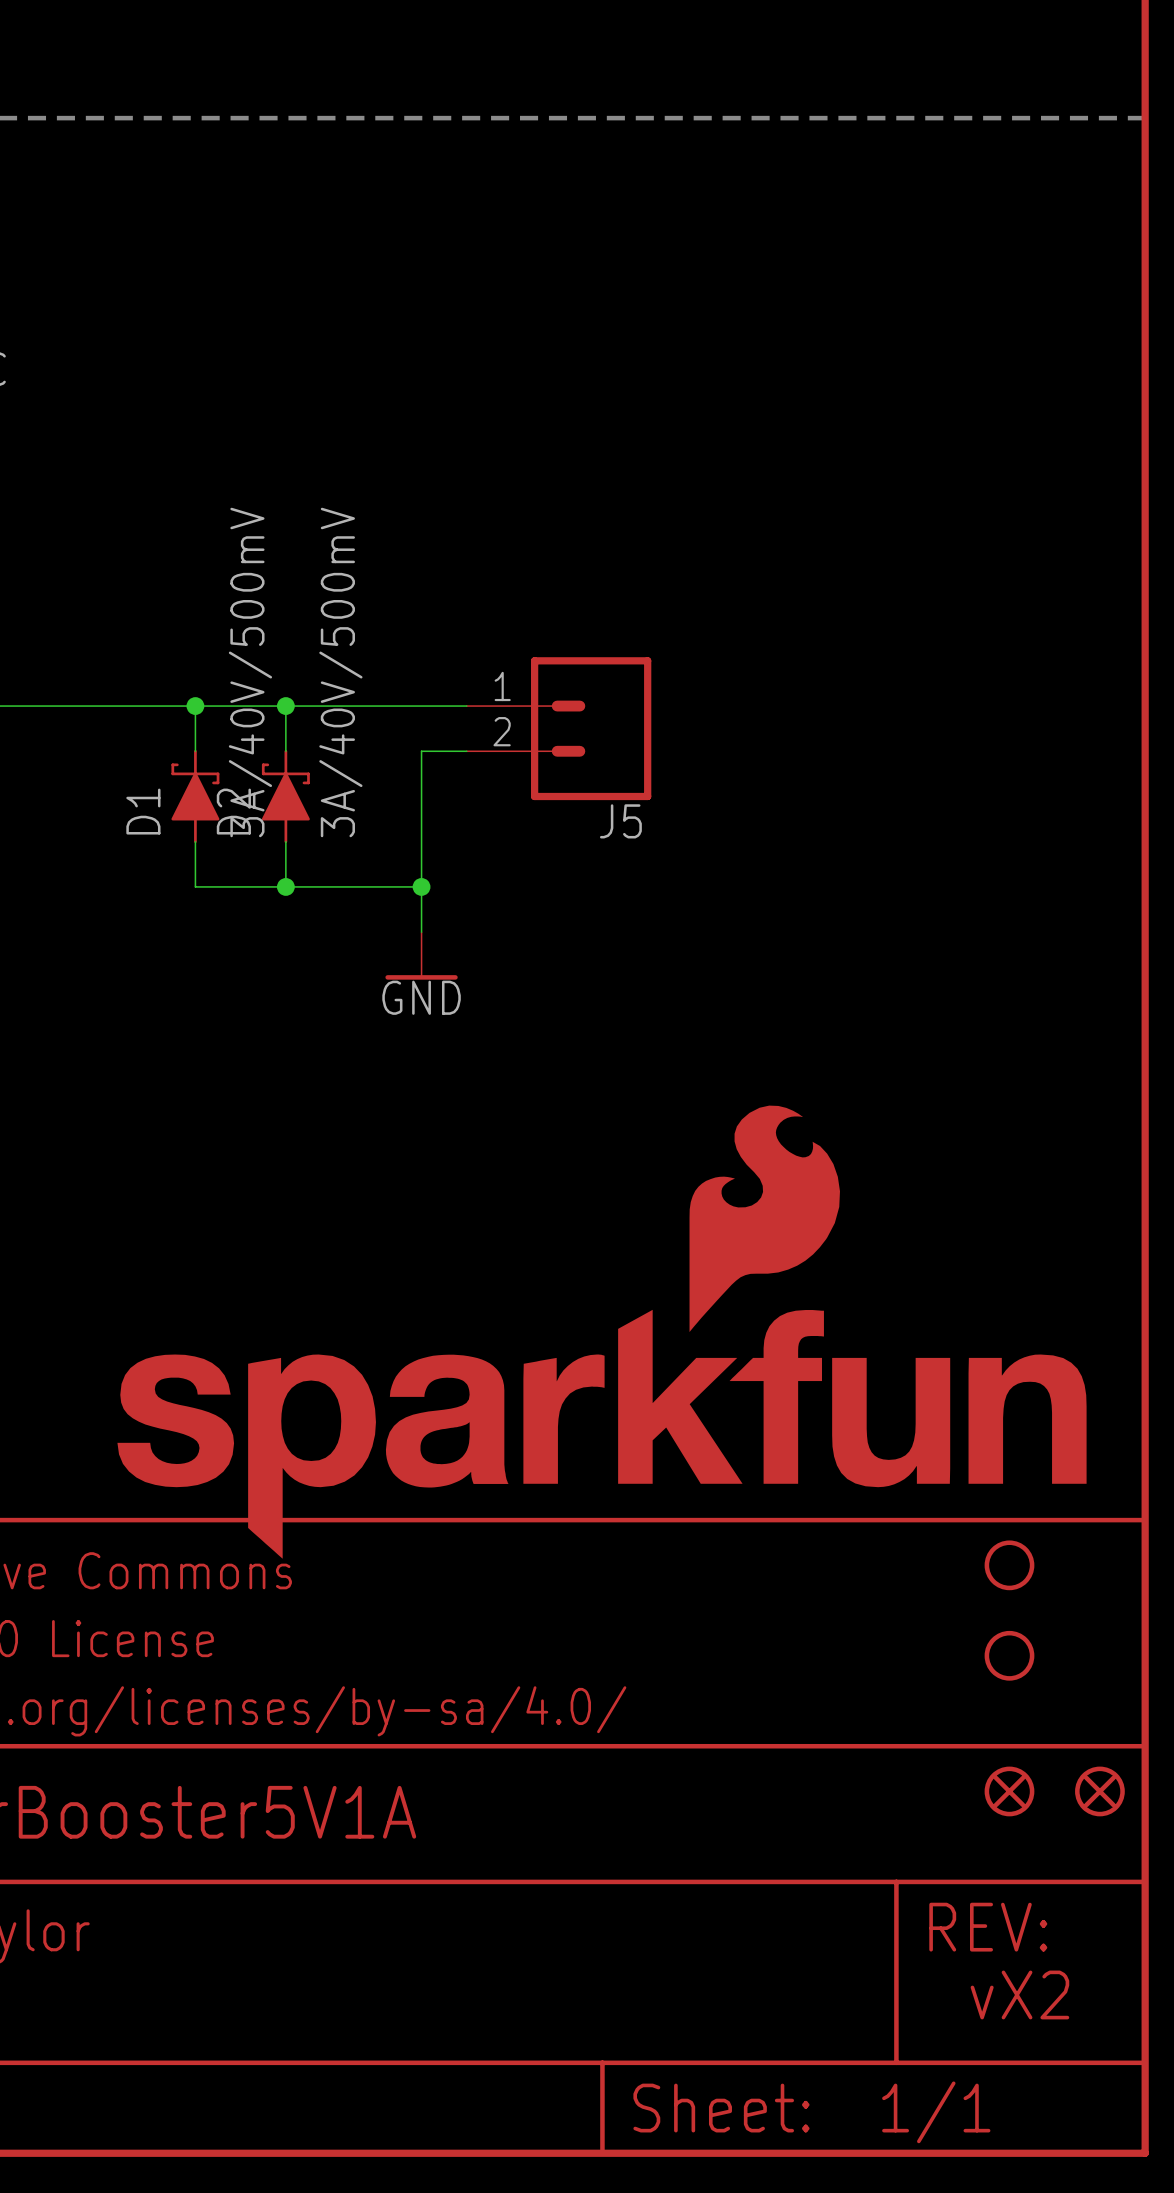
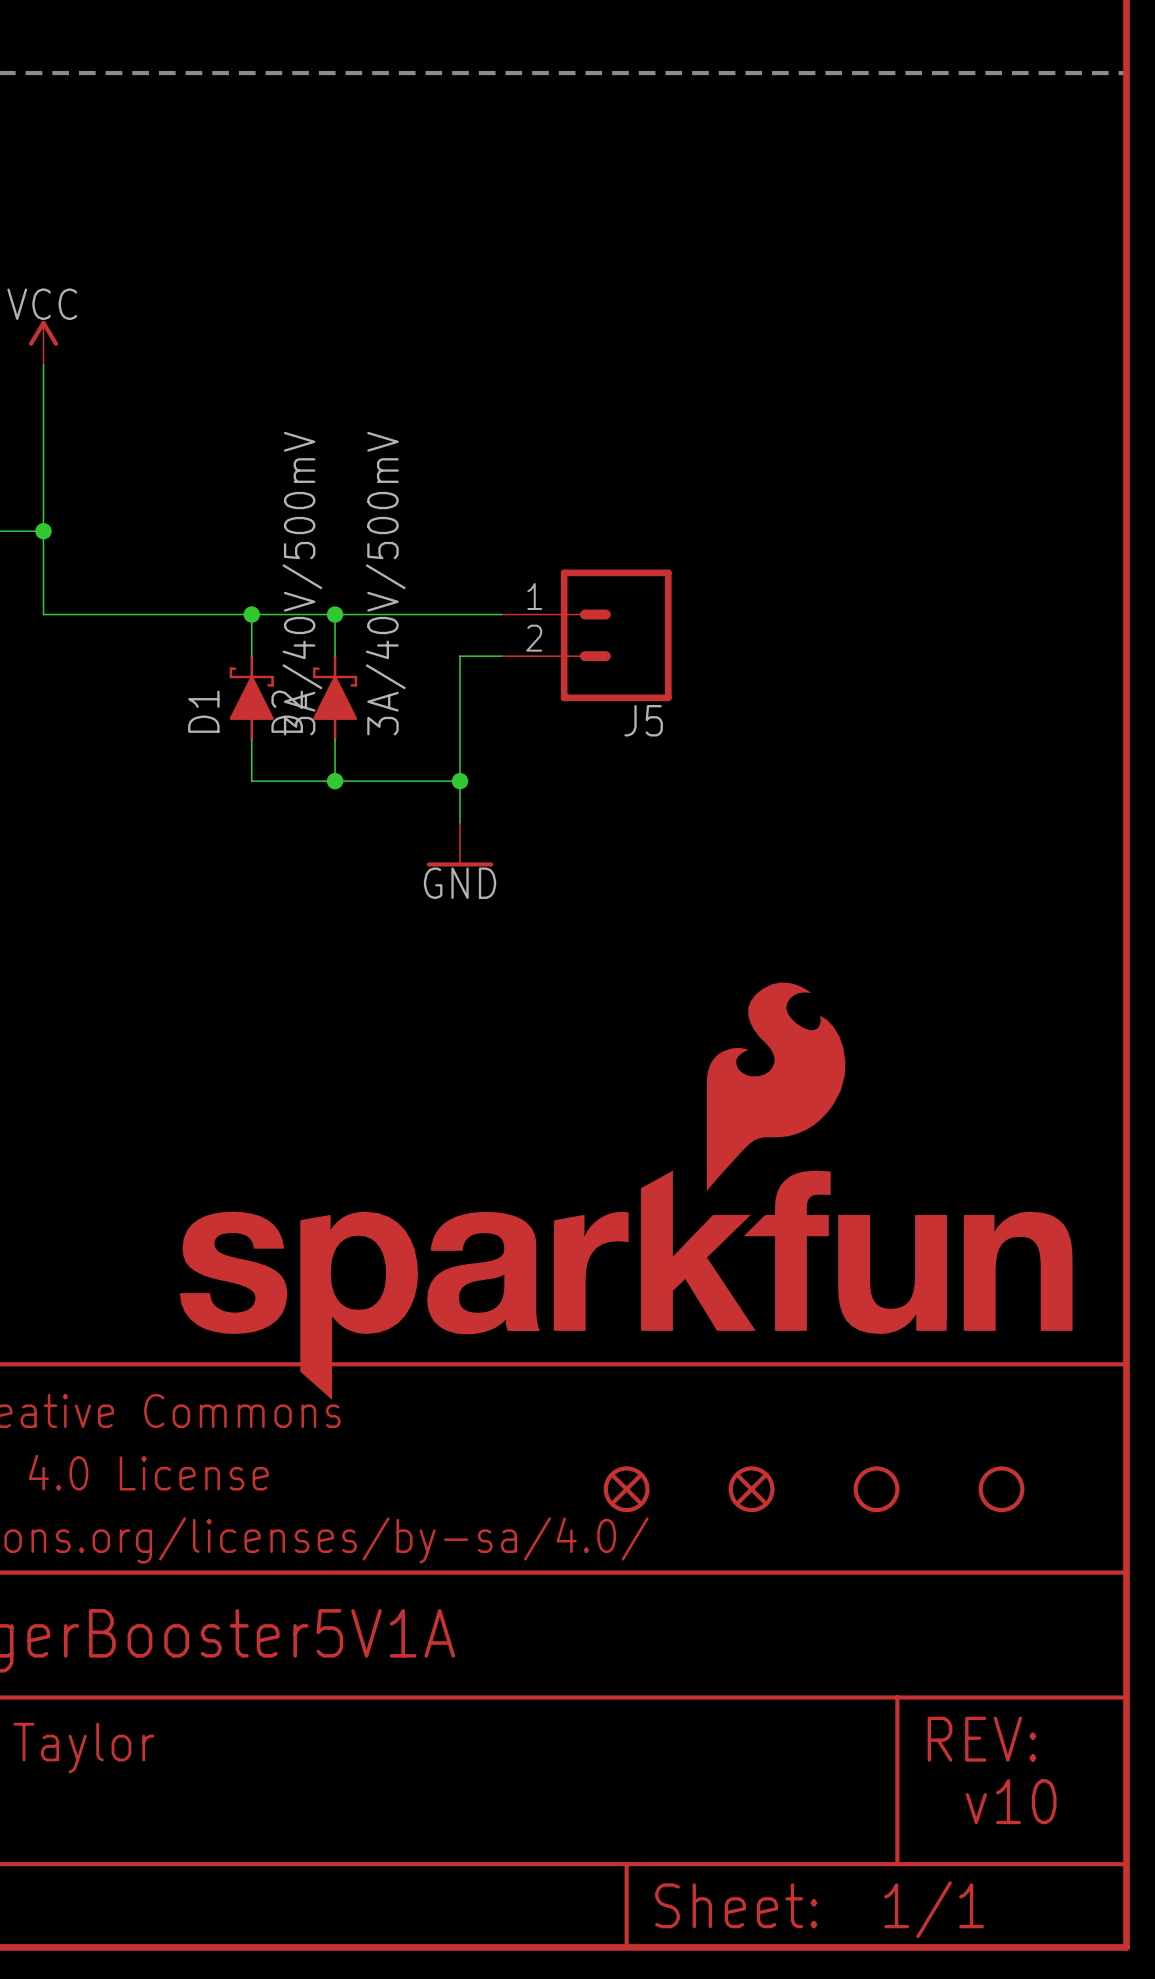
part position: (1009, 1565) -> (876, 1489)
part: none -> (626, 1489)
part: none -> (751, 1489)
part: (1009, 1791) -> none
part: (1099, 1791) -> none
text: vX2 (1019, 1994) -> v10 (1011, 1801)

